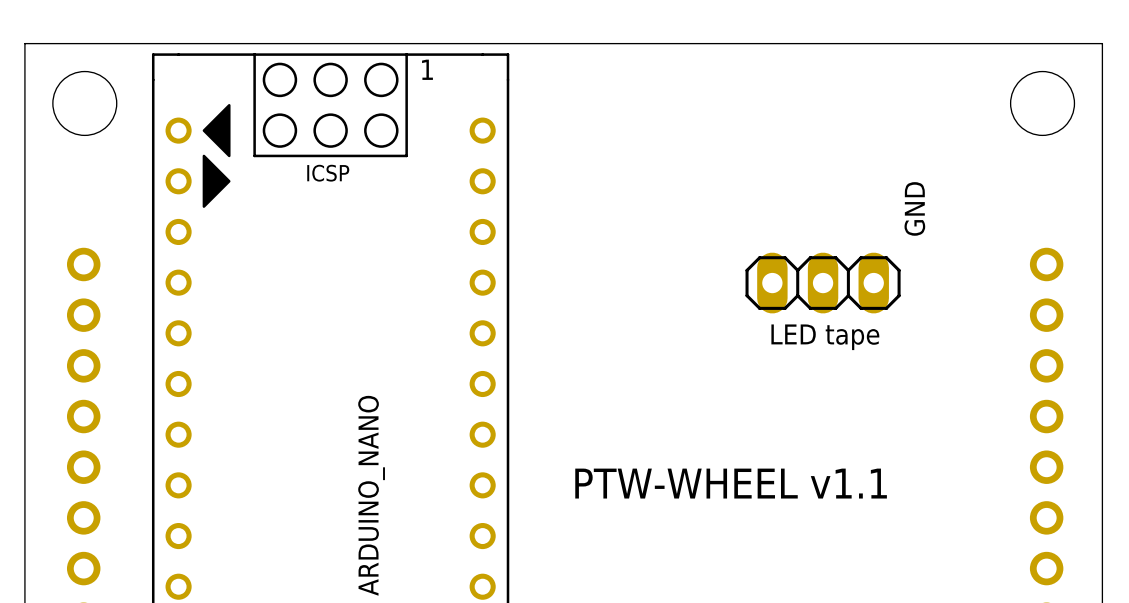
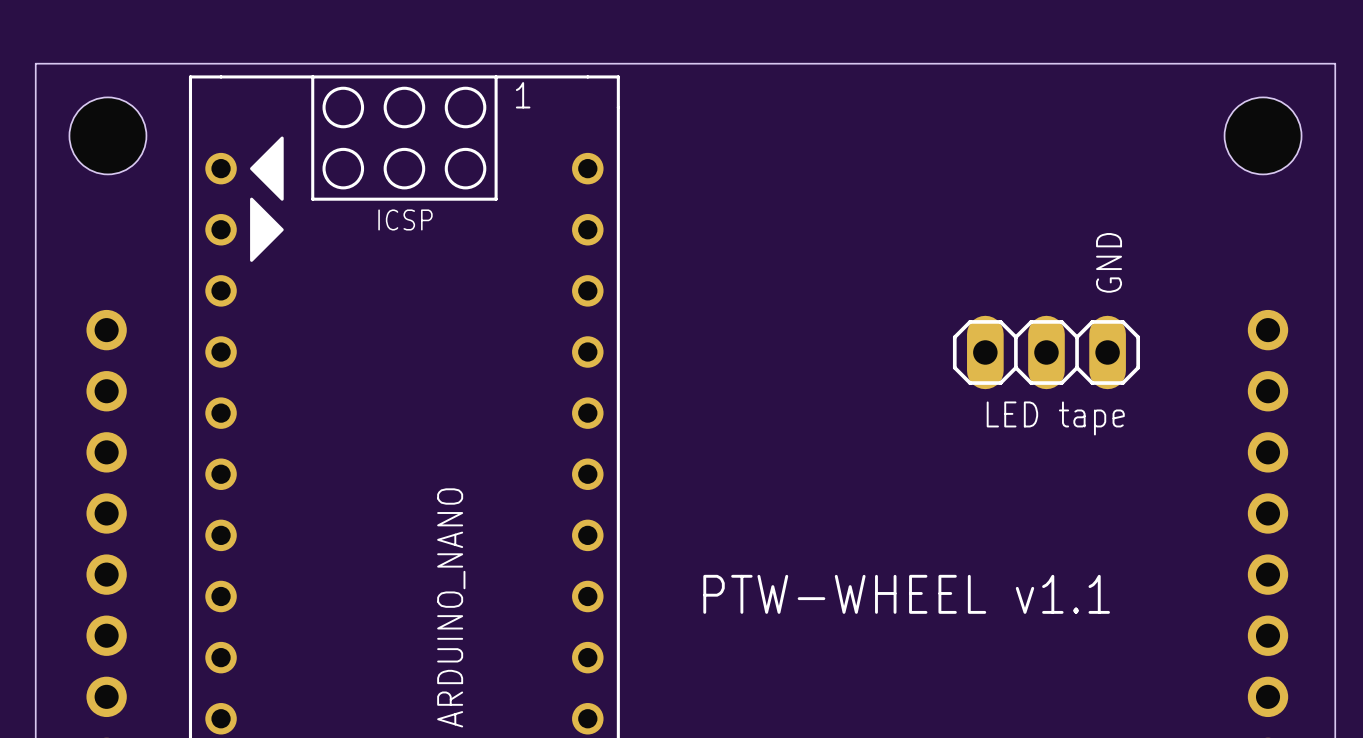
part position: (823, 283) -> (1046, 352)

